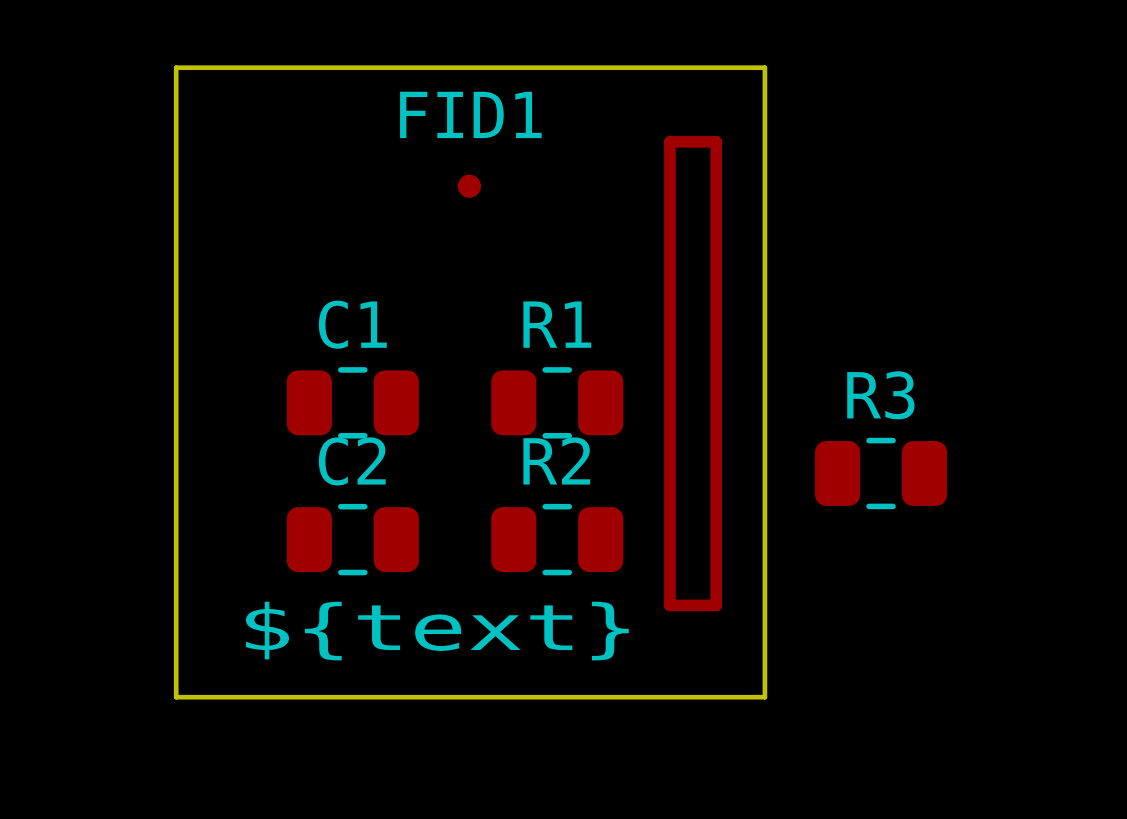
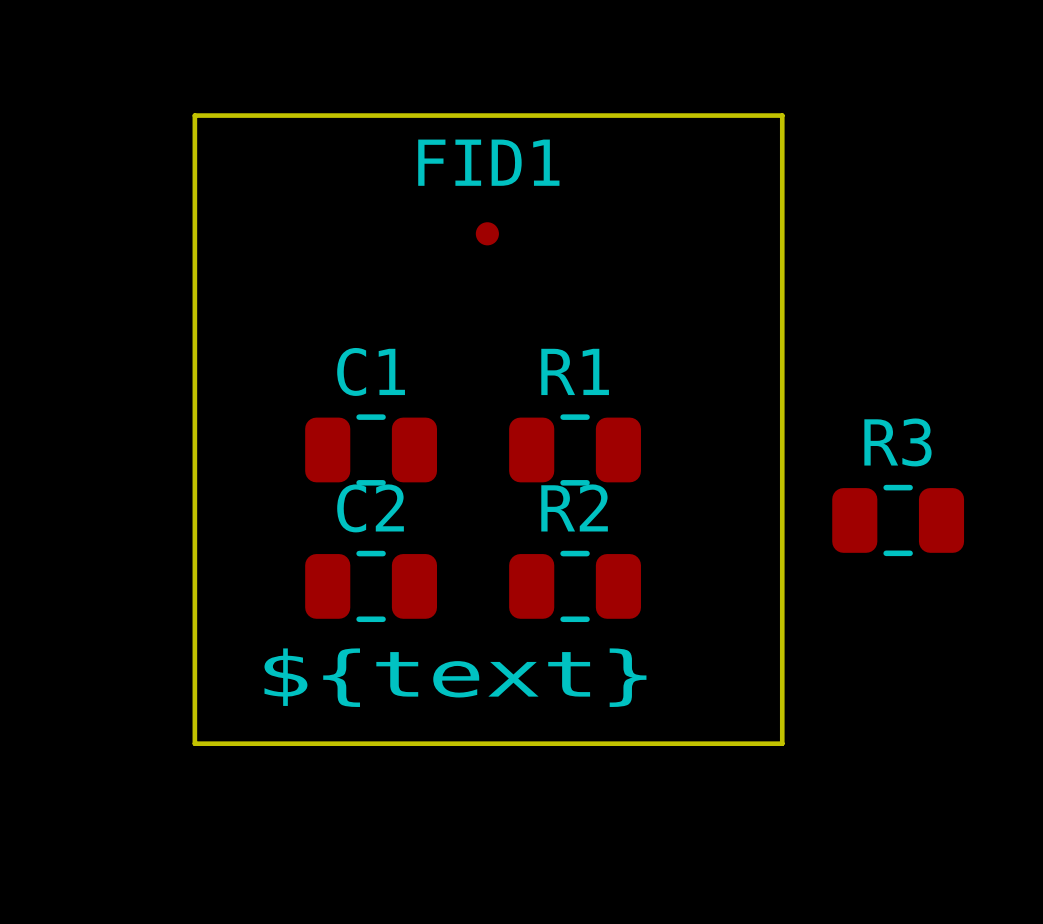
top track: (669, 141) (669, 605) (716, 605) (716, 141) (669, 141) -> none

